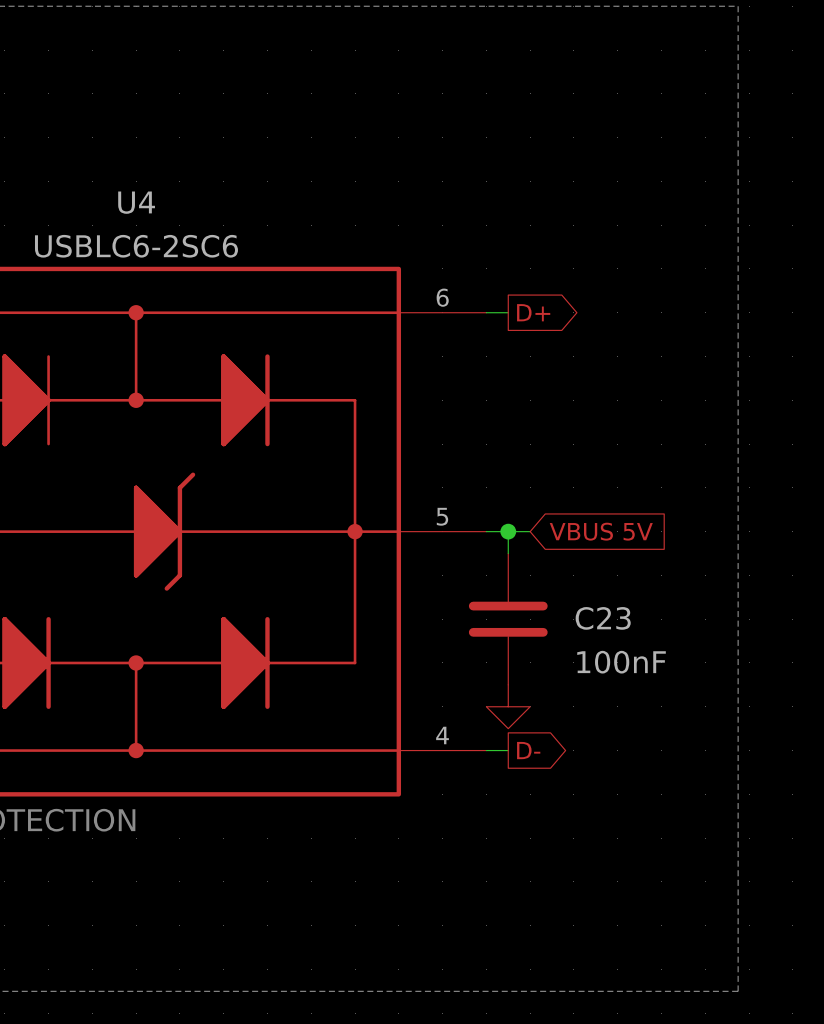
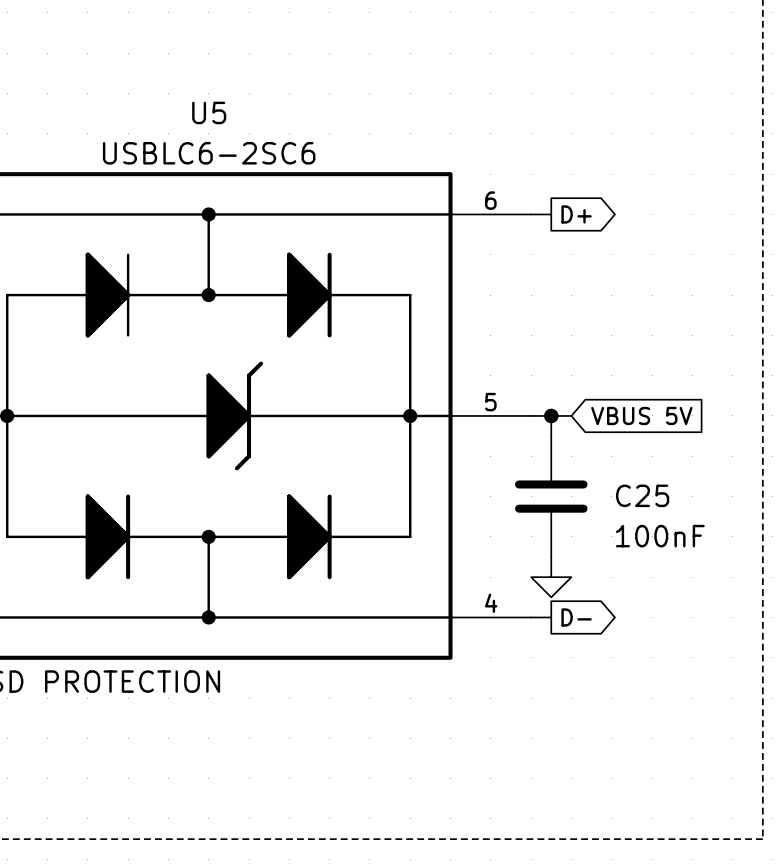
U4 name: U4 (136, 202) -> U5 (209, 112)
C23 name: C23 (603, 618) -> C25 (642, 495)

